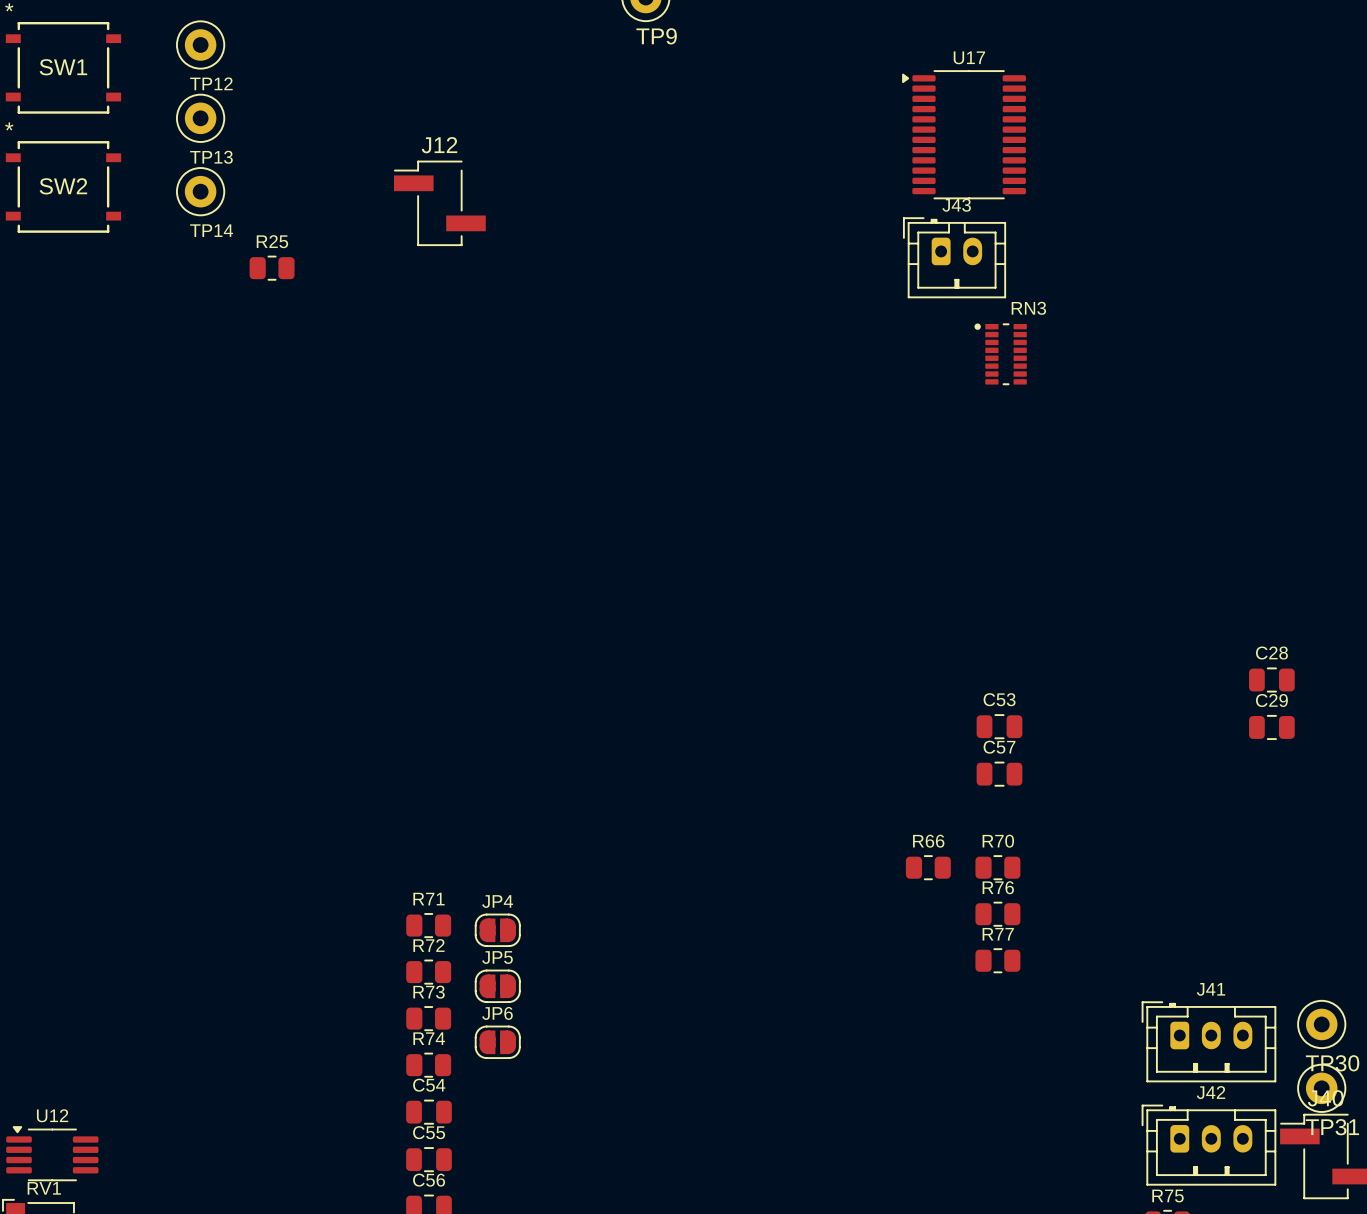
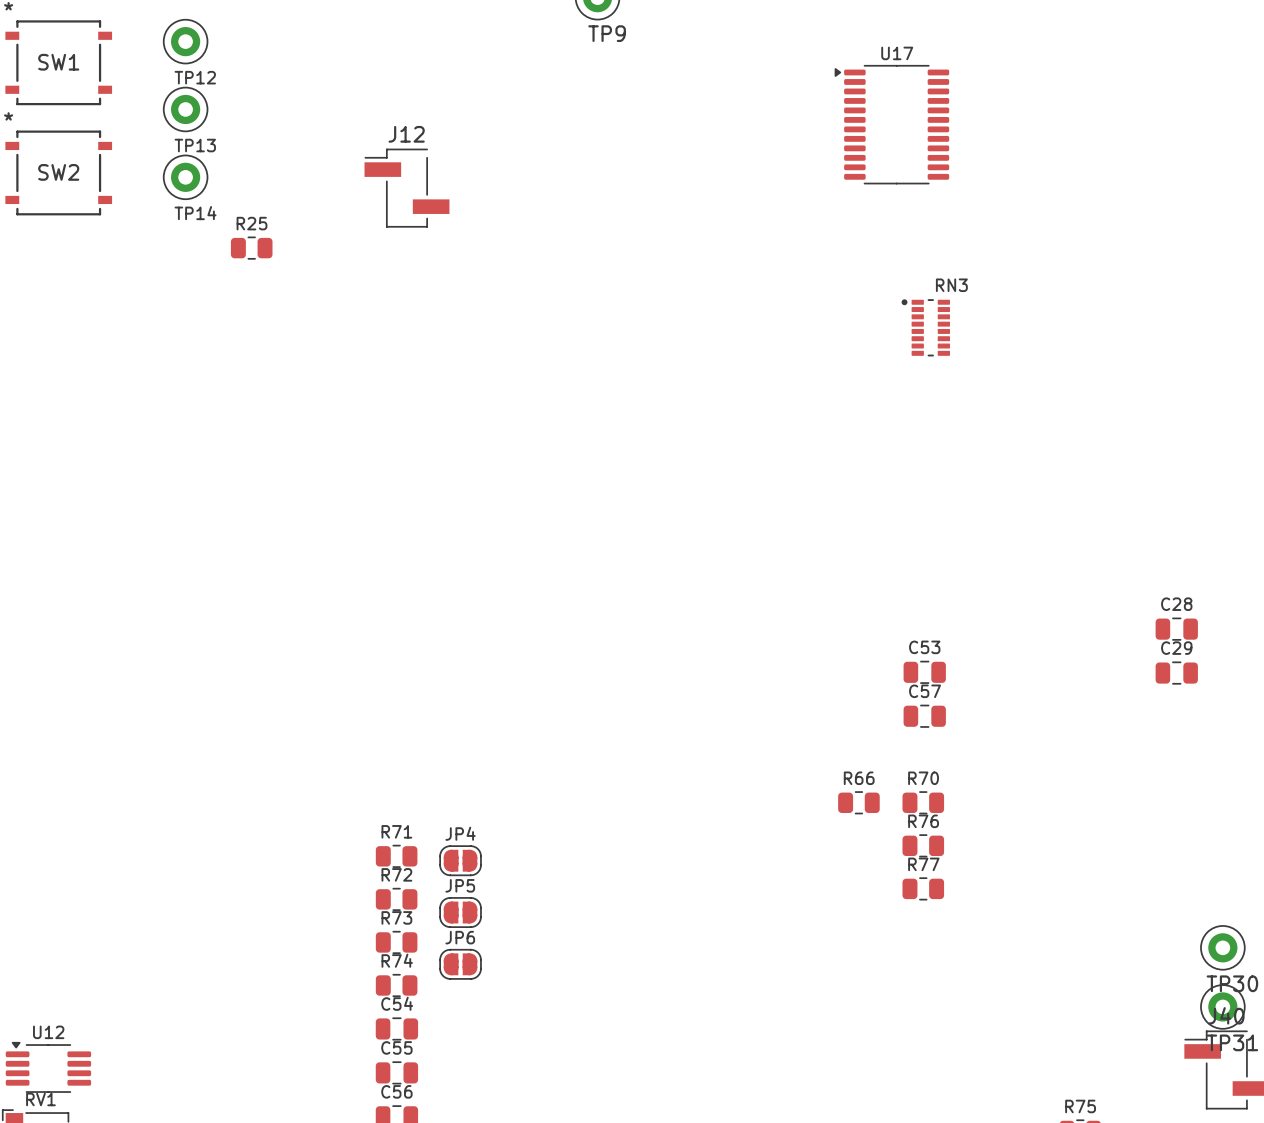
J43: (954, 257) -> none
J41: (1208, 1041) -> none
J42: (1208, 1145) -> none

